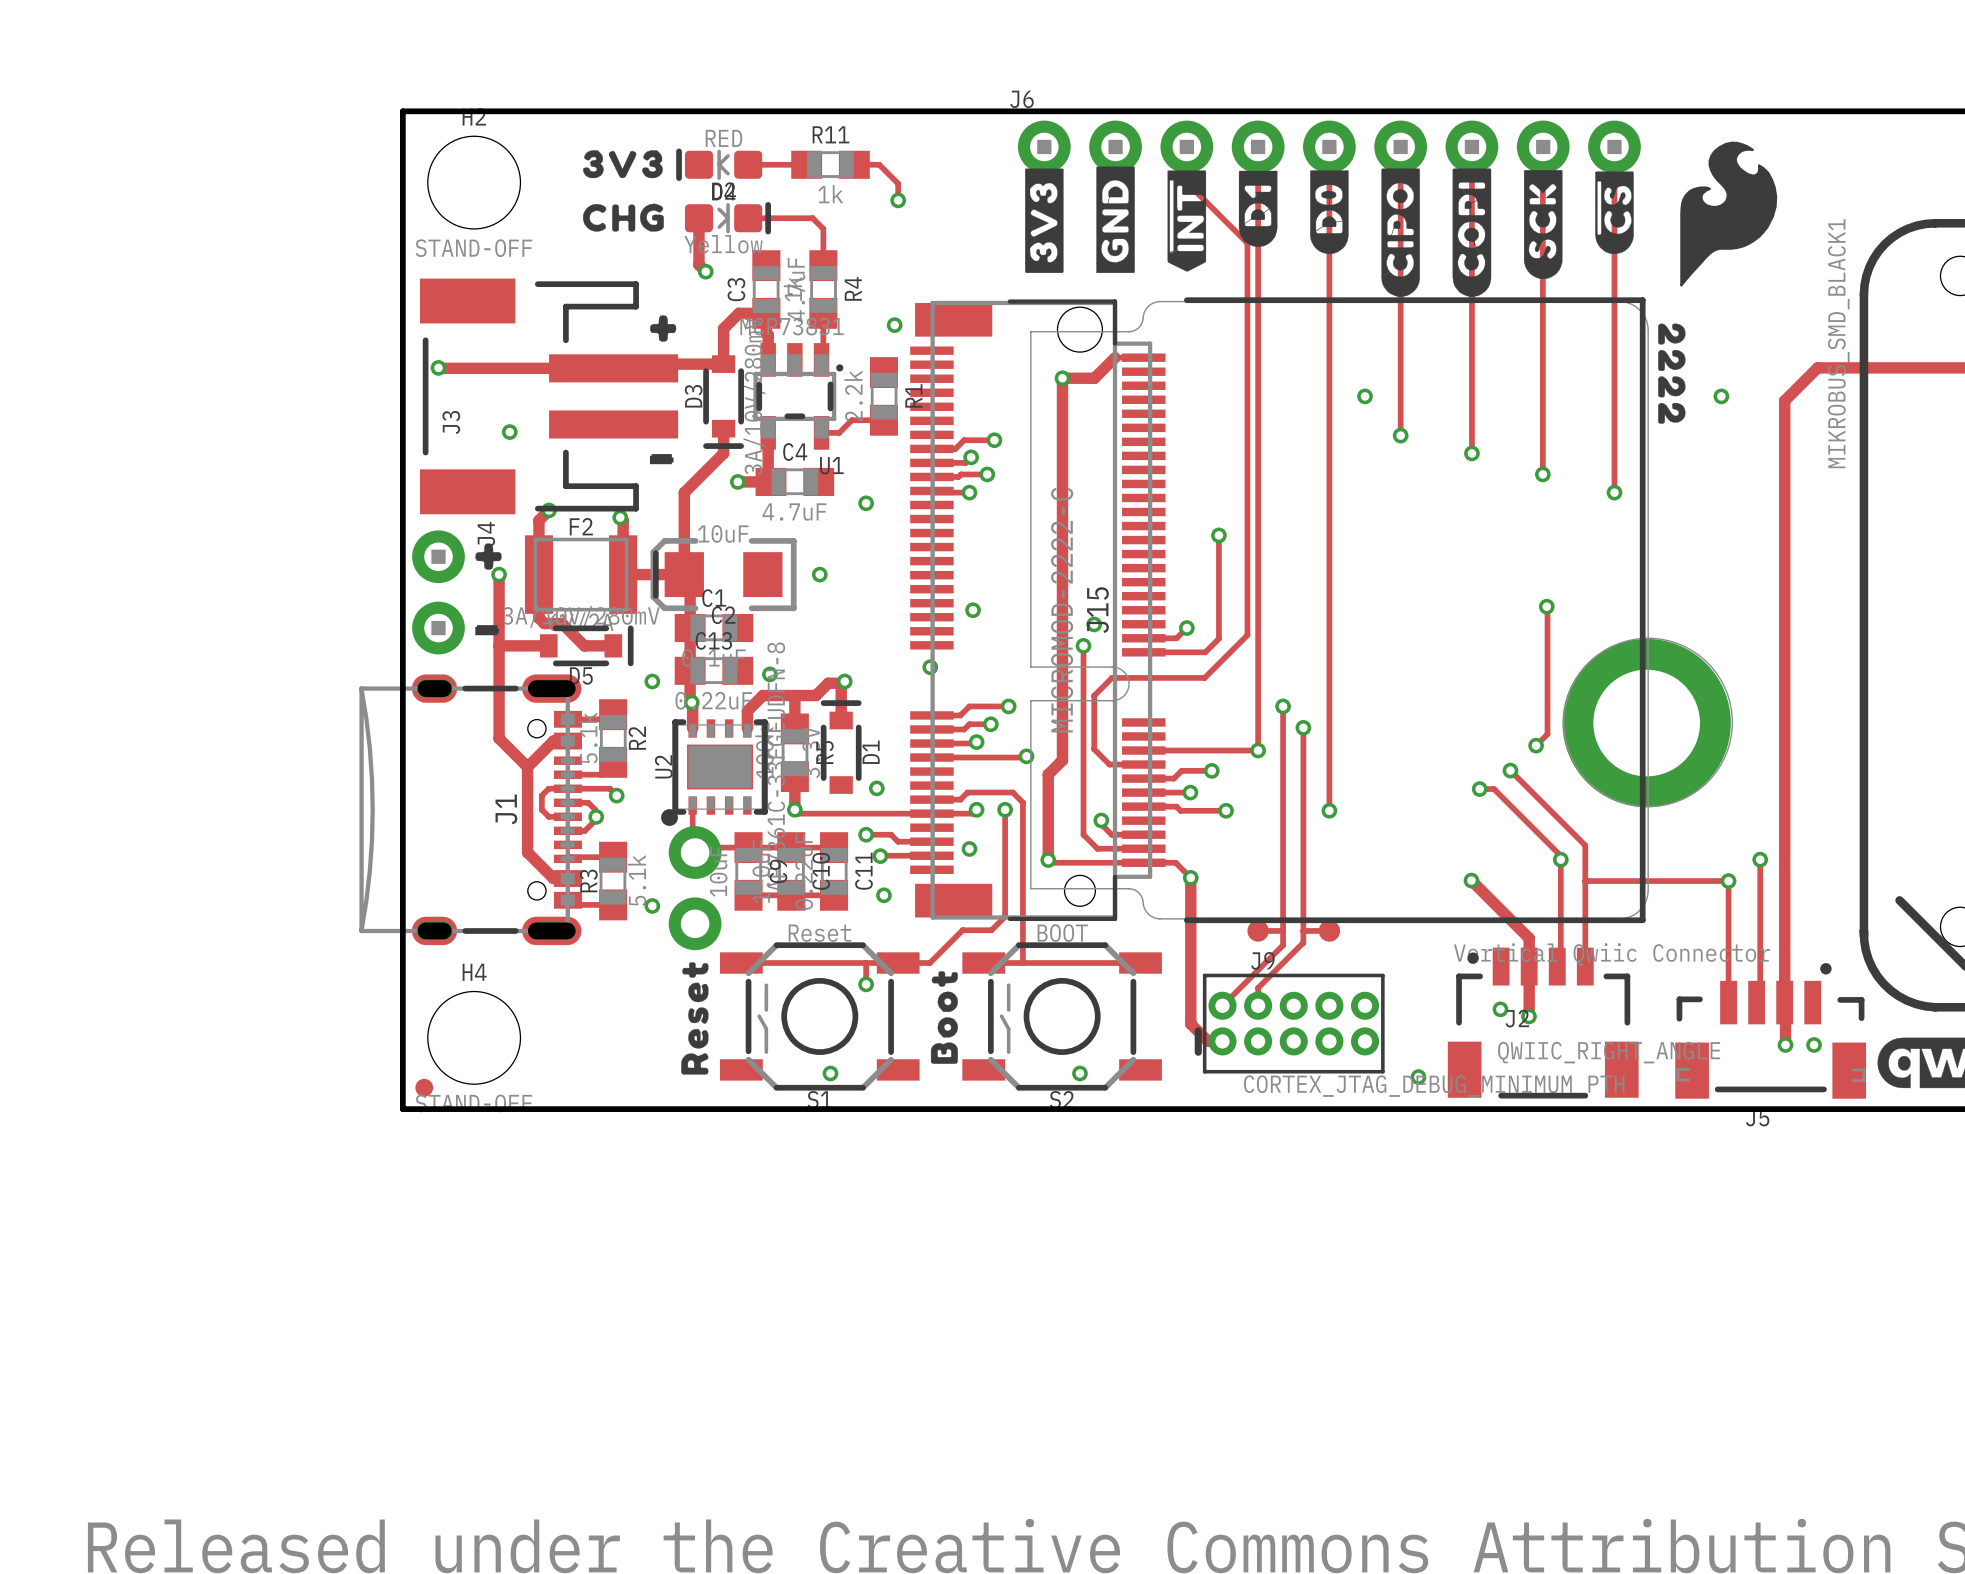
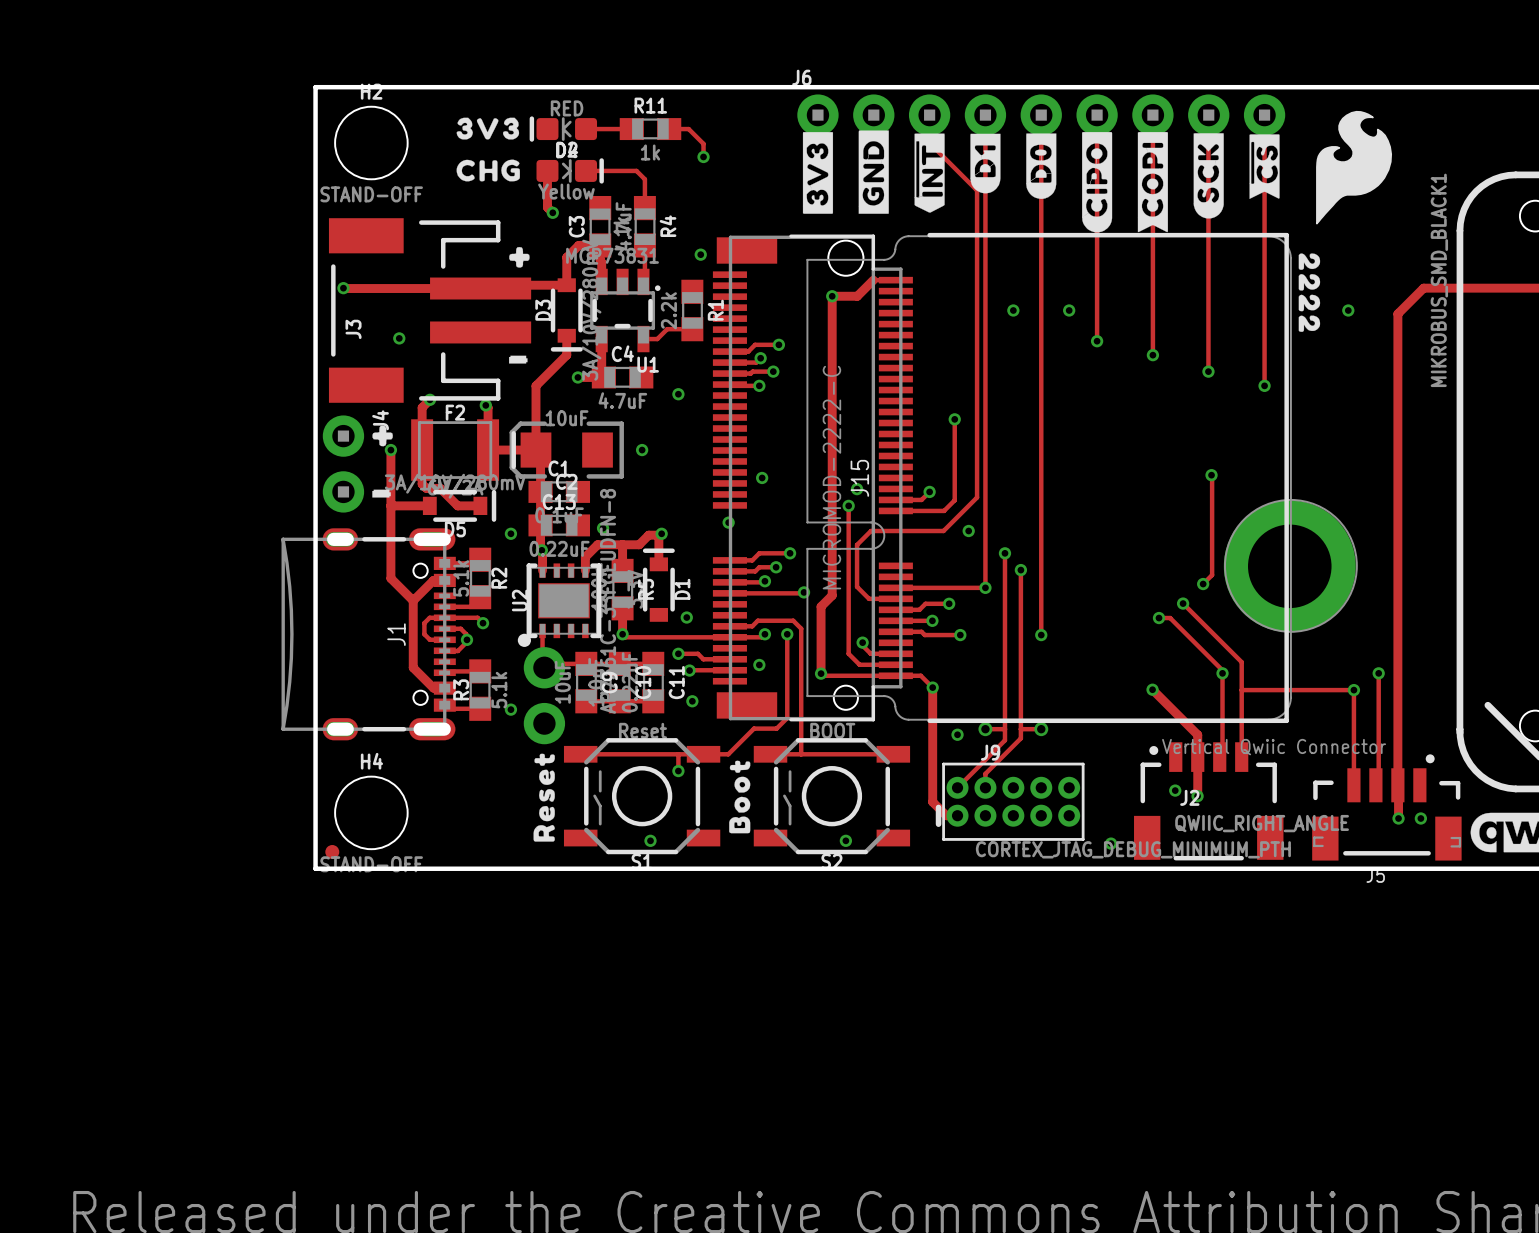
drawing shape: [1452, 168, 1492, 297] -> [1137, 132, 1168, 233]
drawing shape: [1595, 171, 1634, 255] -> [1249, 134, 1280, 199]
via: none -> (1013, 310)
via: none -> (968, 531)
part footprint: [1247, 920, 1269, 942] -> [978, 722, 993, 737]
part footprint: [1318, 920, 1341, 942] -> [1034, 722, 1049, 737]
via: none -> (957, 734)

